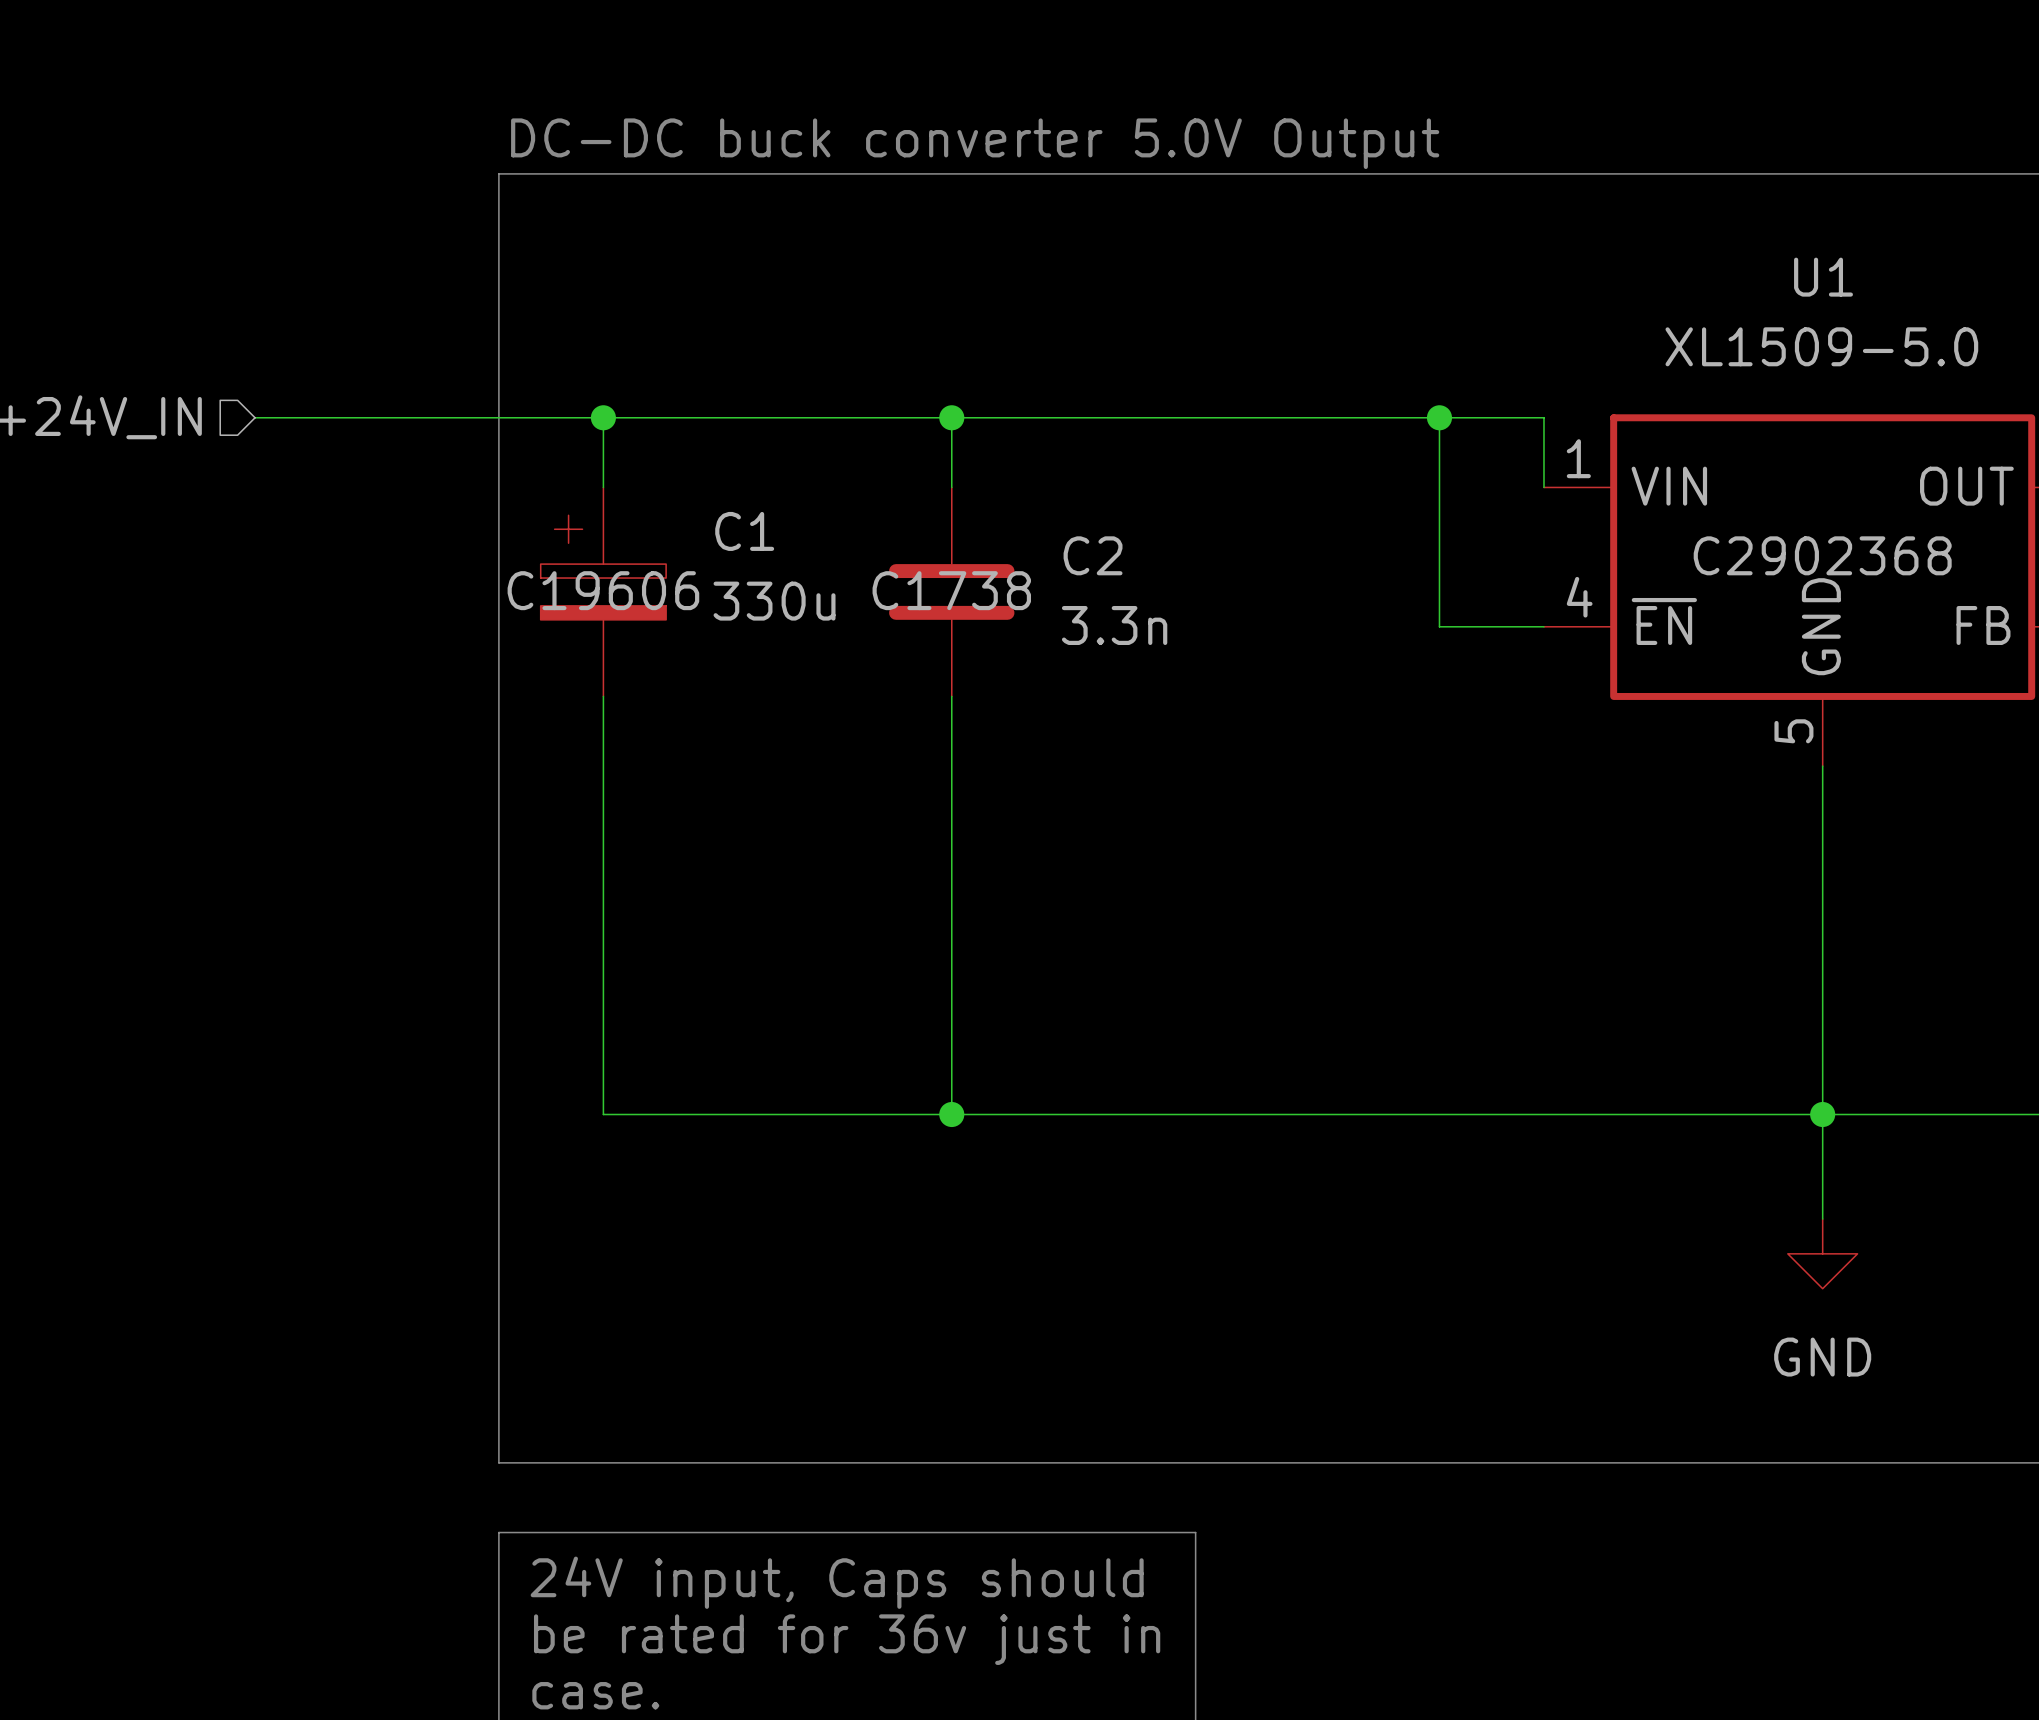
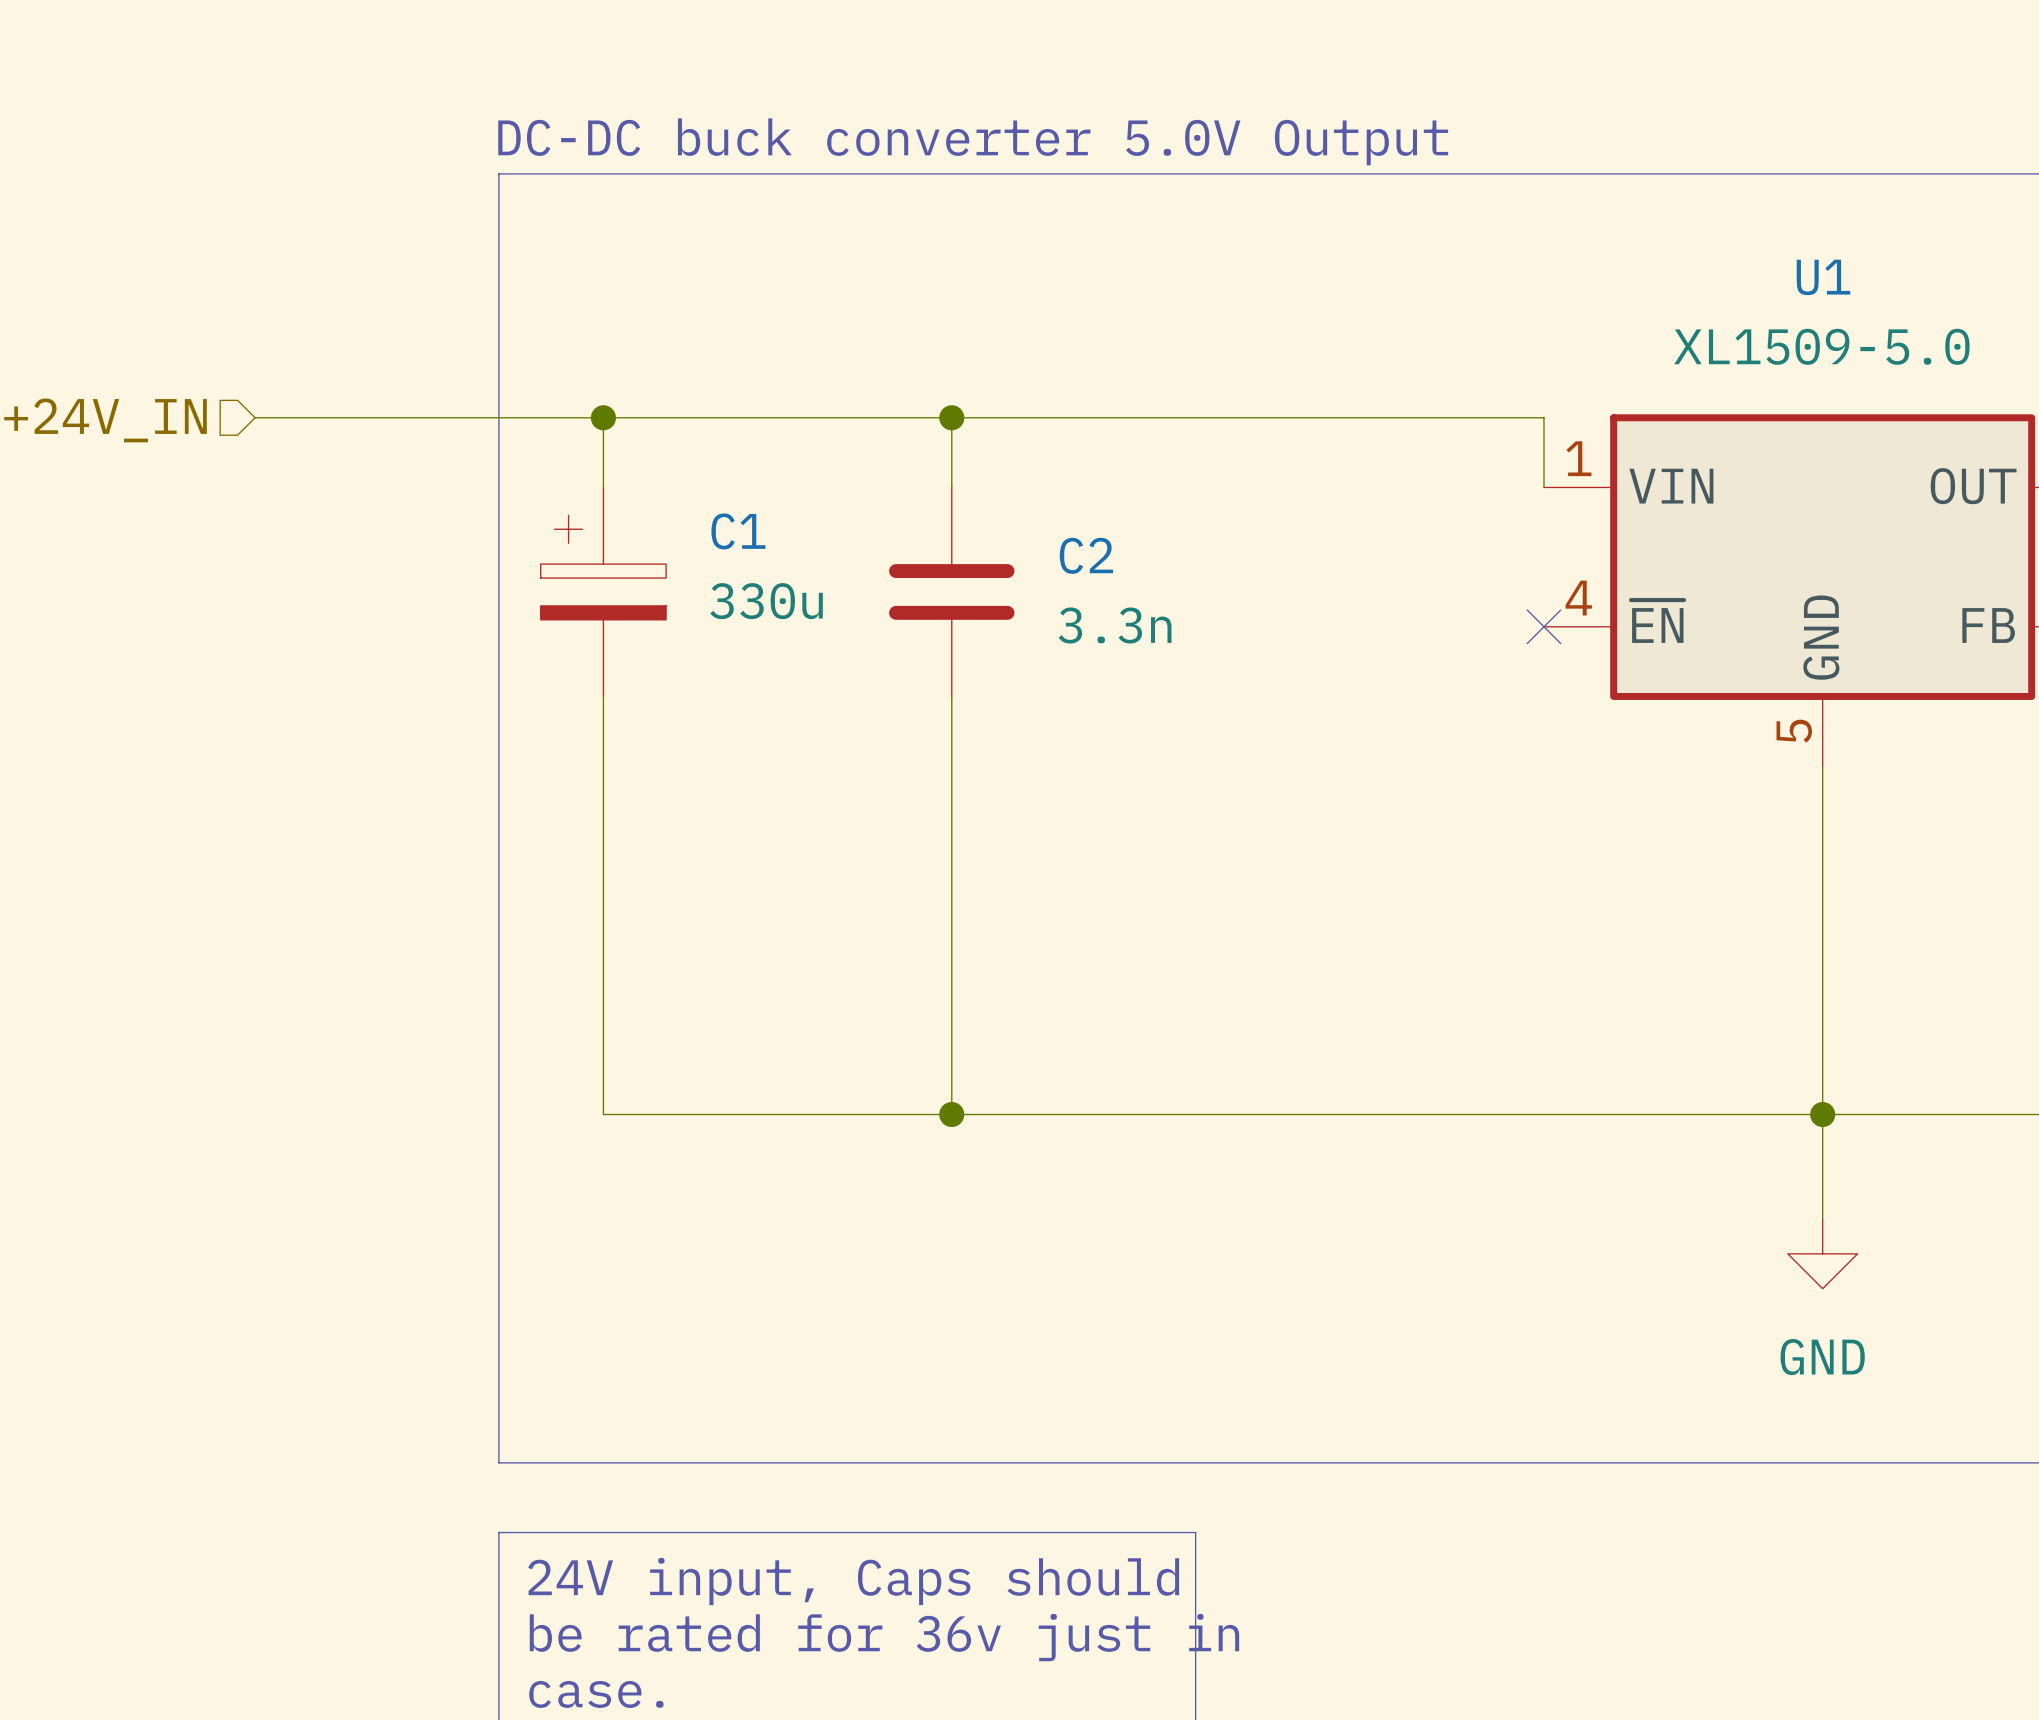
wire: (1439, 417) (1439, 626) (1543, 626) -> none
junction: (1439, 417) -> none
U1 text: C2902368 (1822, 555) -> none
C1 text: C19606 (603, 590) -> none
C2 text: C1738 (951, 590) -> none
no-connect mark: none -> (1543, 626)

